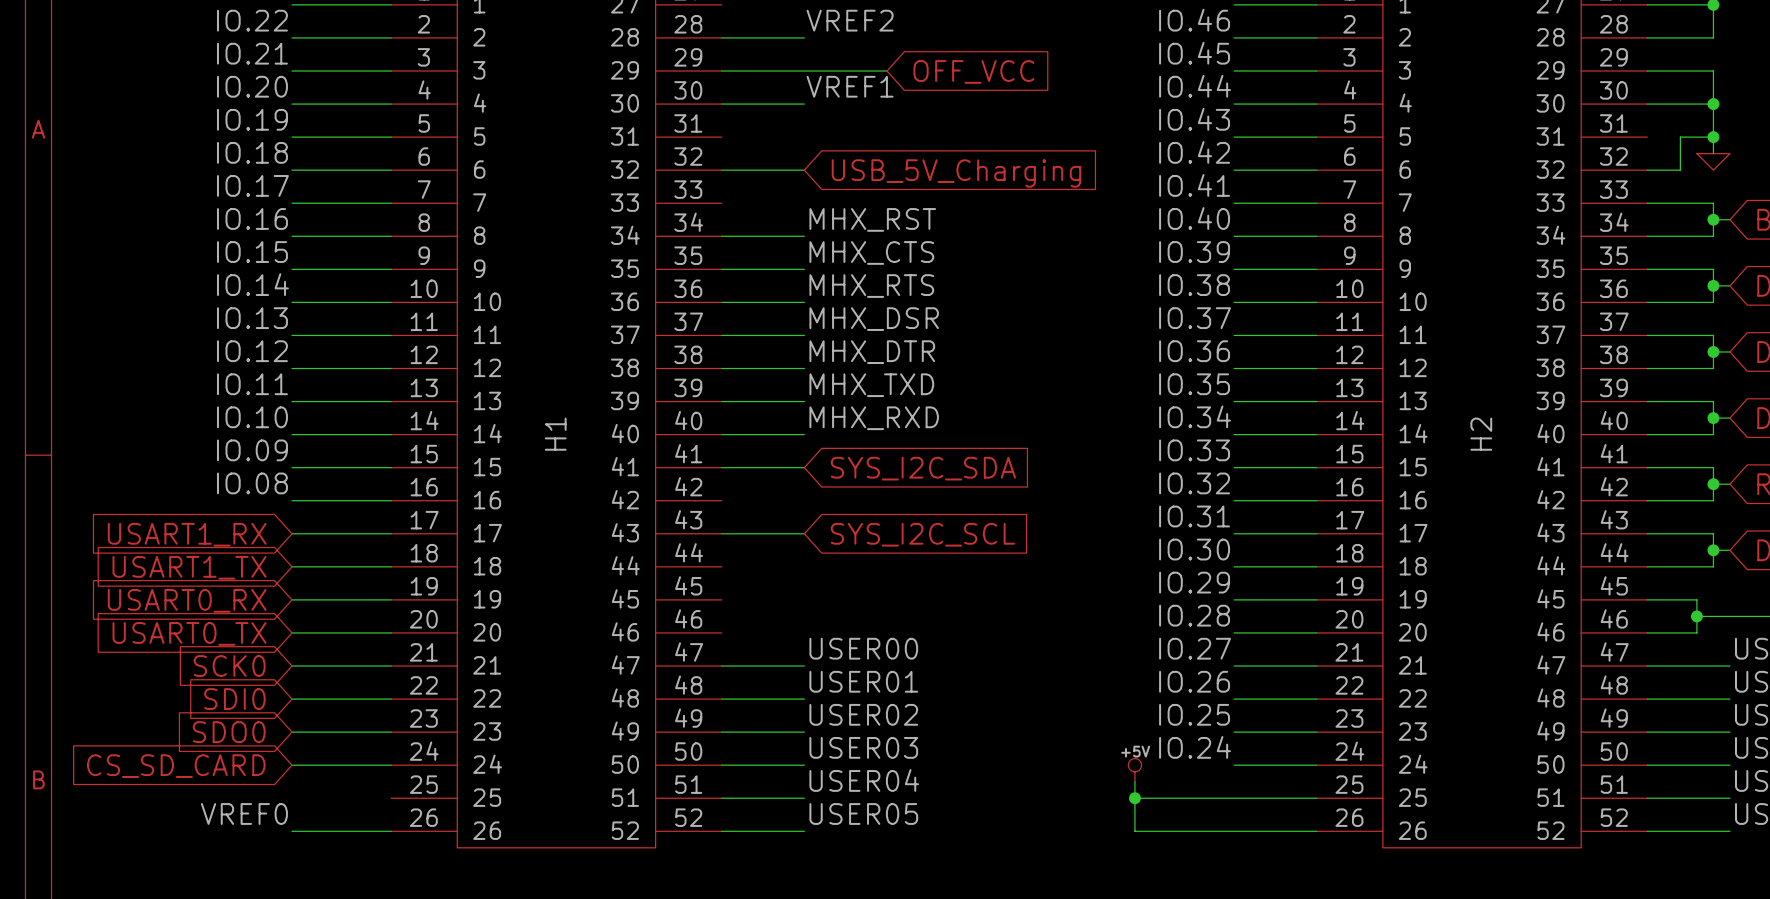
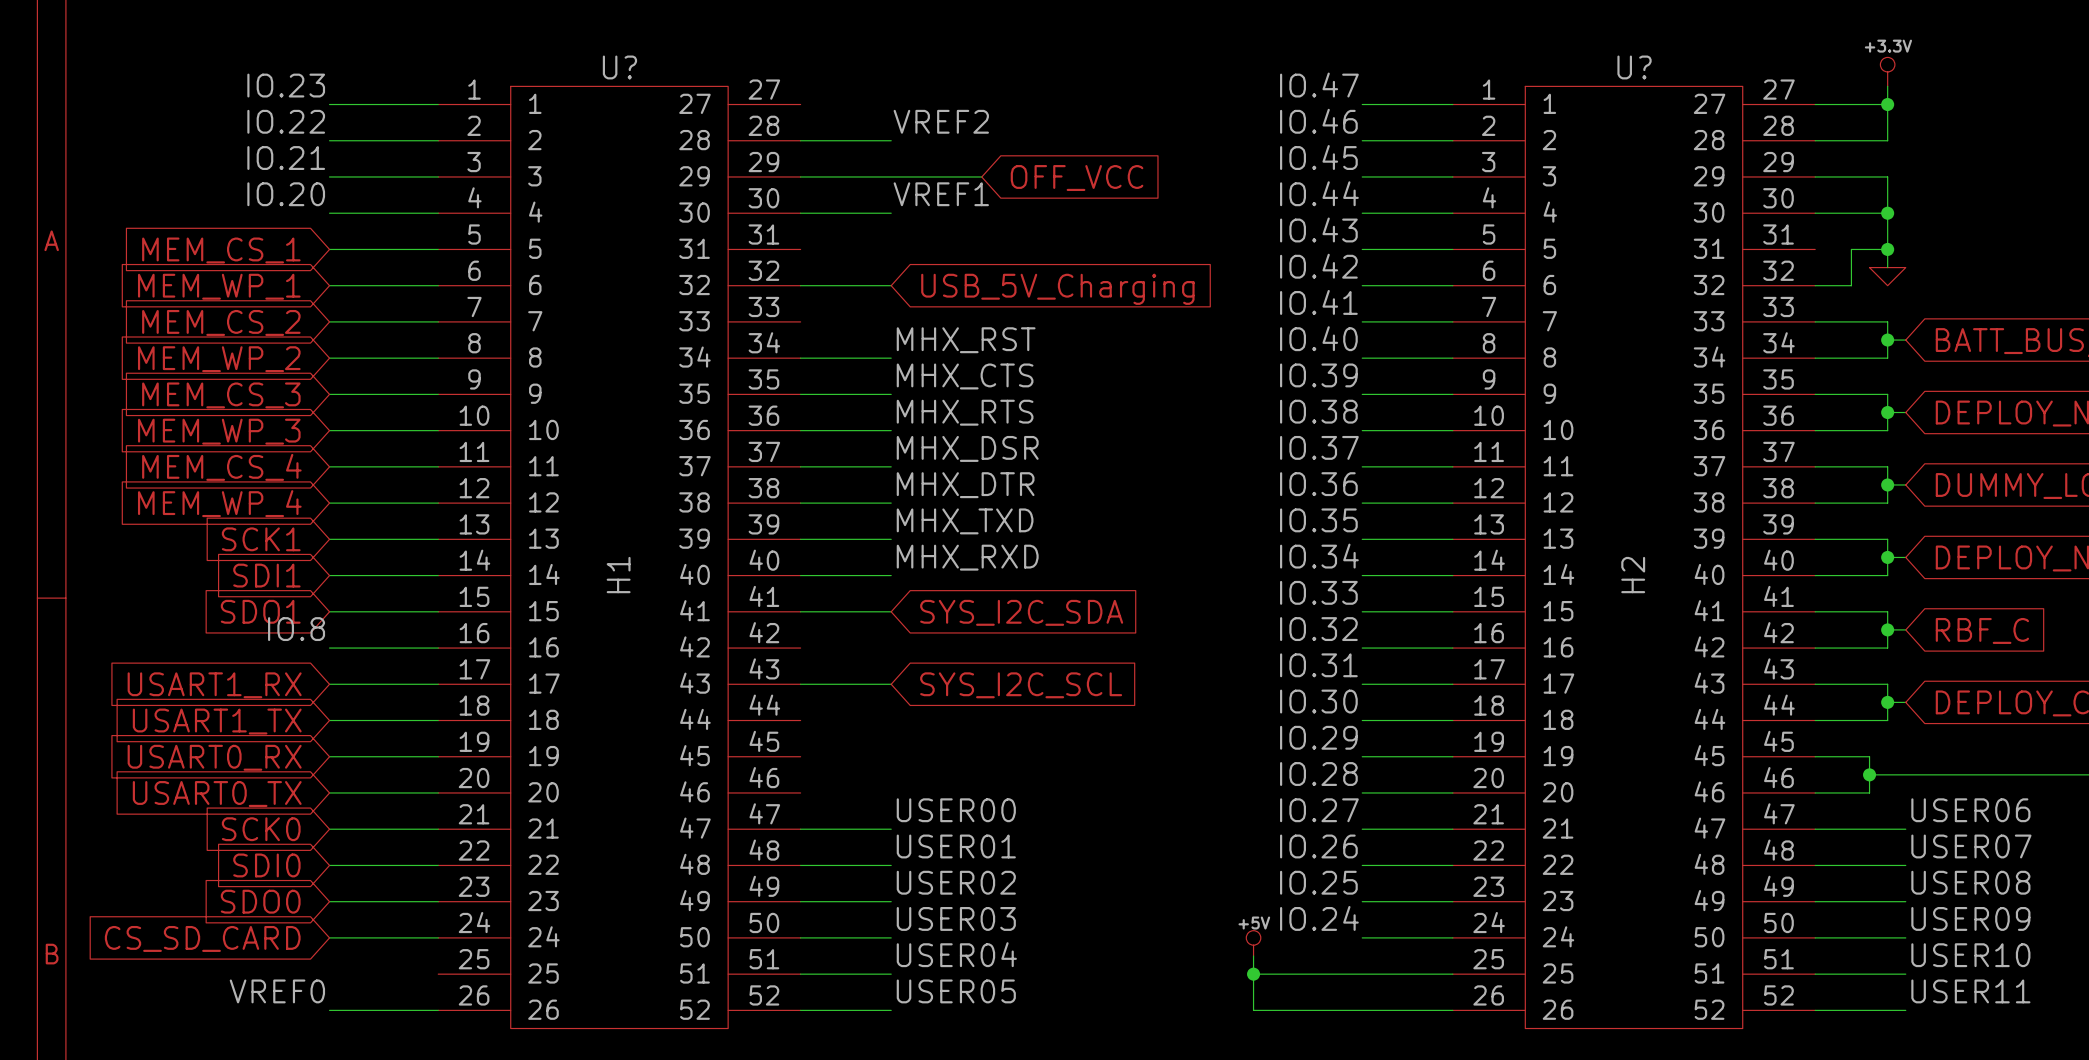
label: IO.19 (252, 119) -> none
global label: none -> MEM_CS_1 (221, 250)
label: IO.18 (252, 152) -> none
global label: none -> MEM_WP_1 (219, 286)
label: IO.17 (252, 185) -> none
global label: none -> MEM_CS_2 (221, 322)
label: IO.16 (252, 218) -> none
global label: none -> MEM_WP_2 (219, 359)
label: IO.15 (252, 252) -> none
global label: none -> MEM_CS_3 (221, 395)
label: IO.14 (252, 284) -> none
global label: none -> MEM_WP_3 (219, 431)
label: IO.13 (252, 318) -> none
global label: none -> MEM_CS_4 (221, 467)
label: IO.12 (252, 351) -> none
global label: none -> MEM_WP_4 (219, 503)
label: IO.11 (252, 384) -> none
global label: none -> SCK1 (261, 539)
label: IO.10 (252, 417) -> none
global label: none -> SDI1 (266, 575)
label: IO.09 (252, 450) -> none
global label: none -> SDO1 (260, 611)
label: IO.08 (252, 483) -> IO.8 (296, 629)

